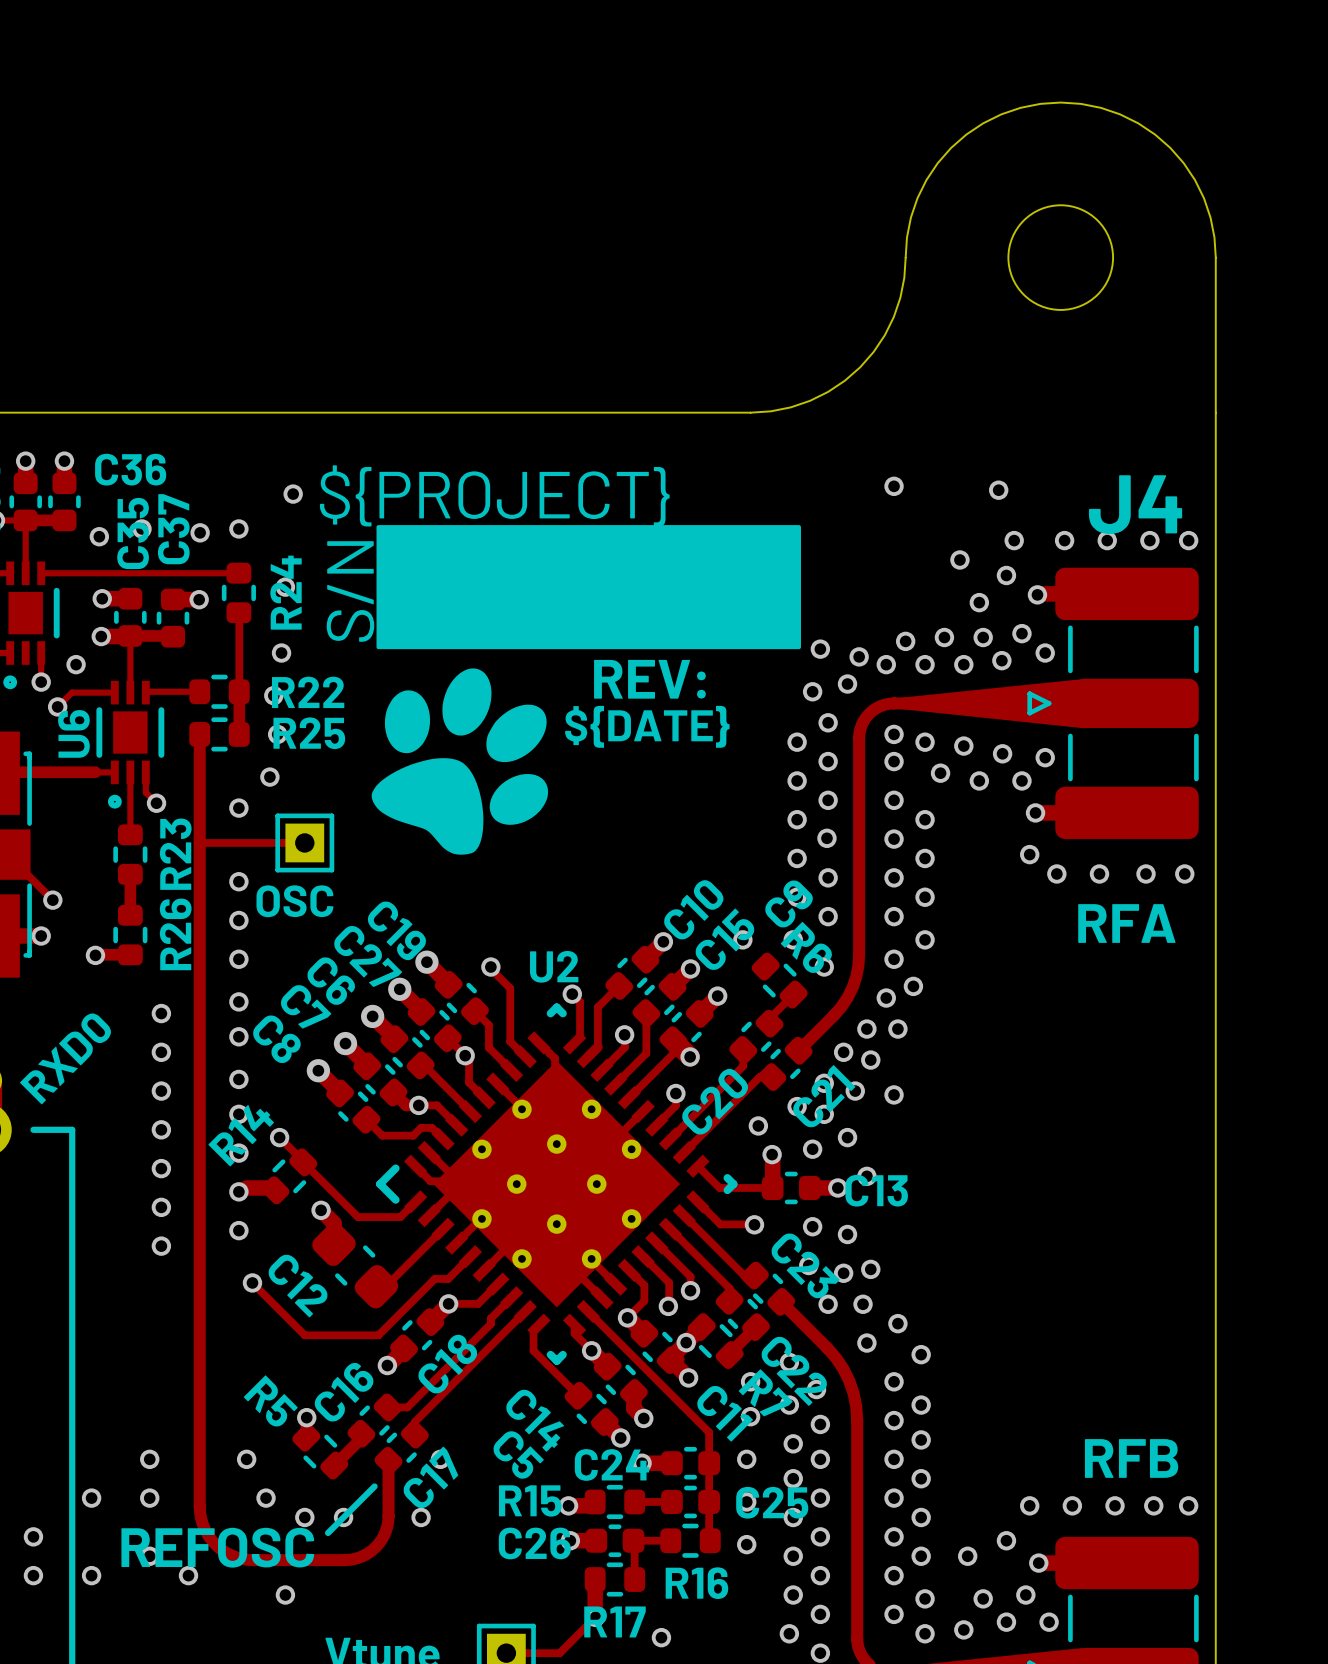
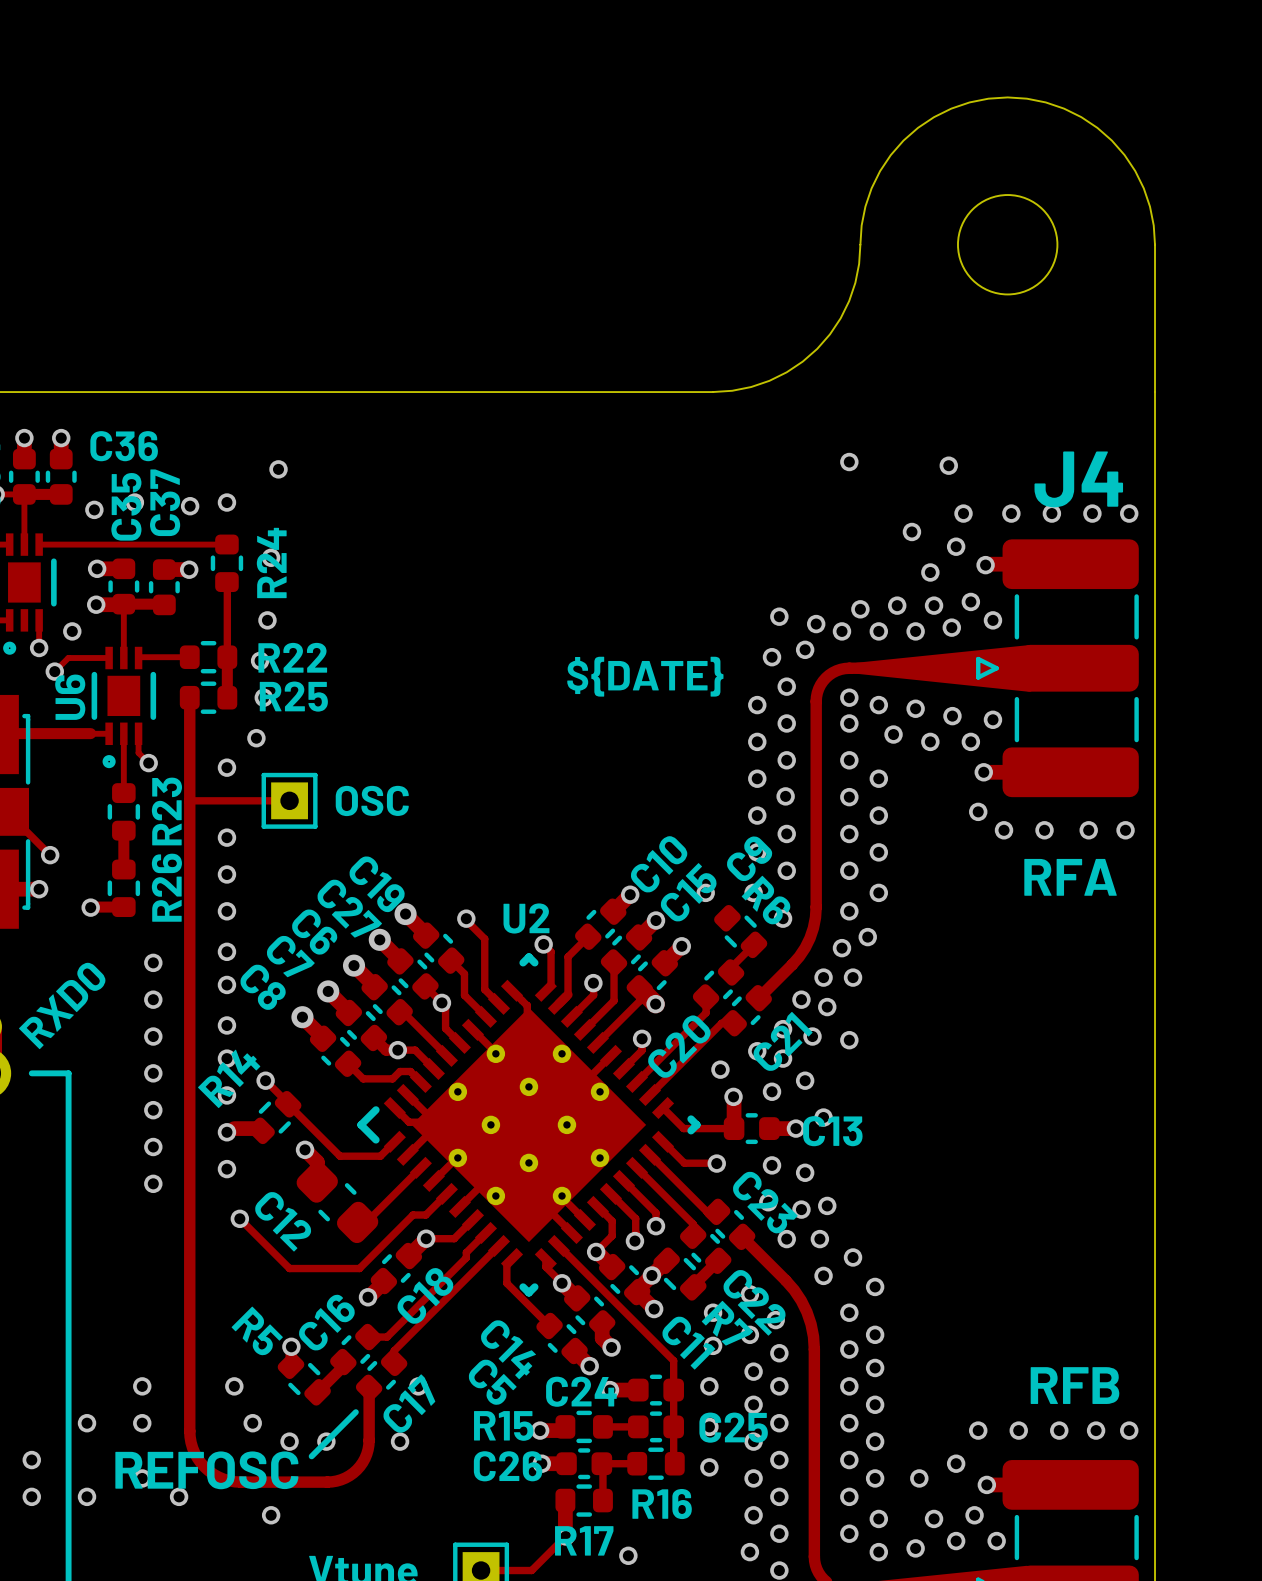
text: ${PROJECT} (494, 495) -> none
drawing: [371, 525, 802, 855] -> none
text: S/N (350, 591) -> none
text: REV: (649, 679) -> none
text position: ${DATE} (647, 726) -> ${DATE} (645, 676)
text position: OSC (294, 901) -> OSC (372, 800)

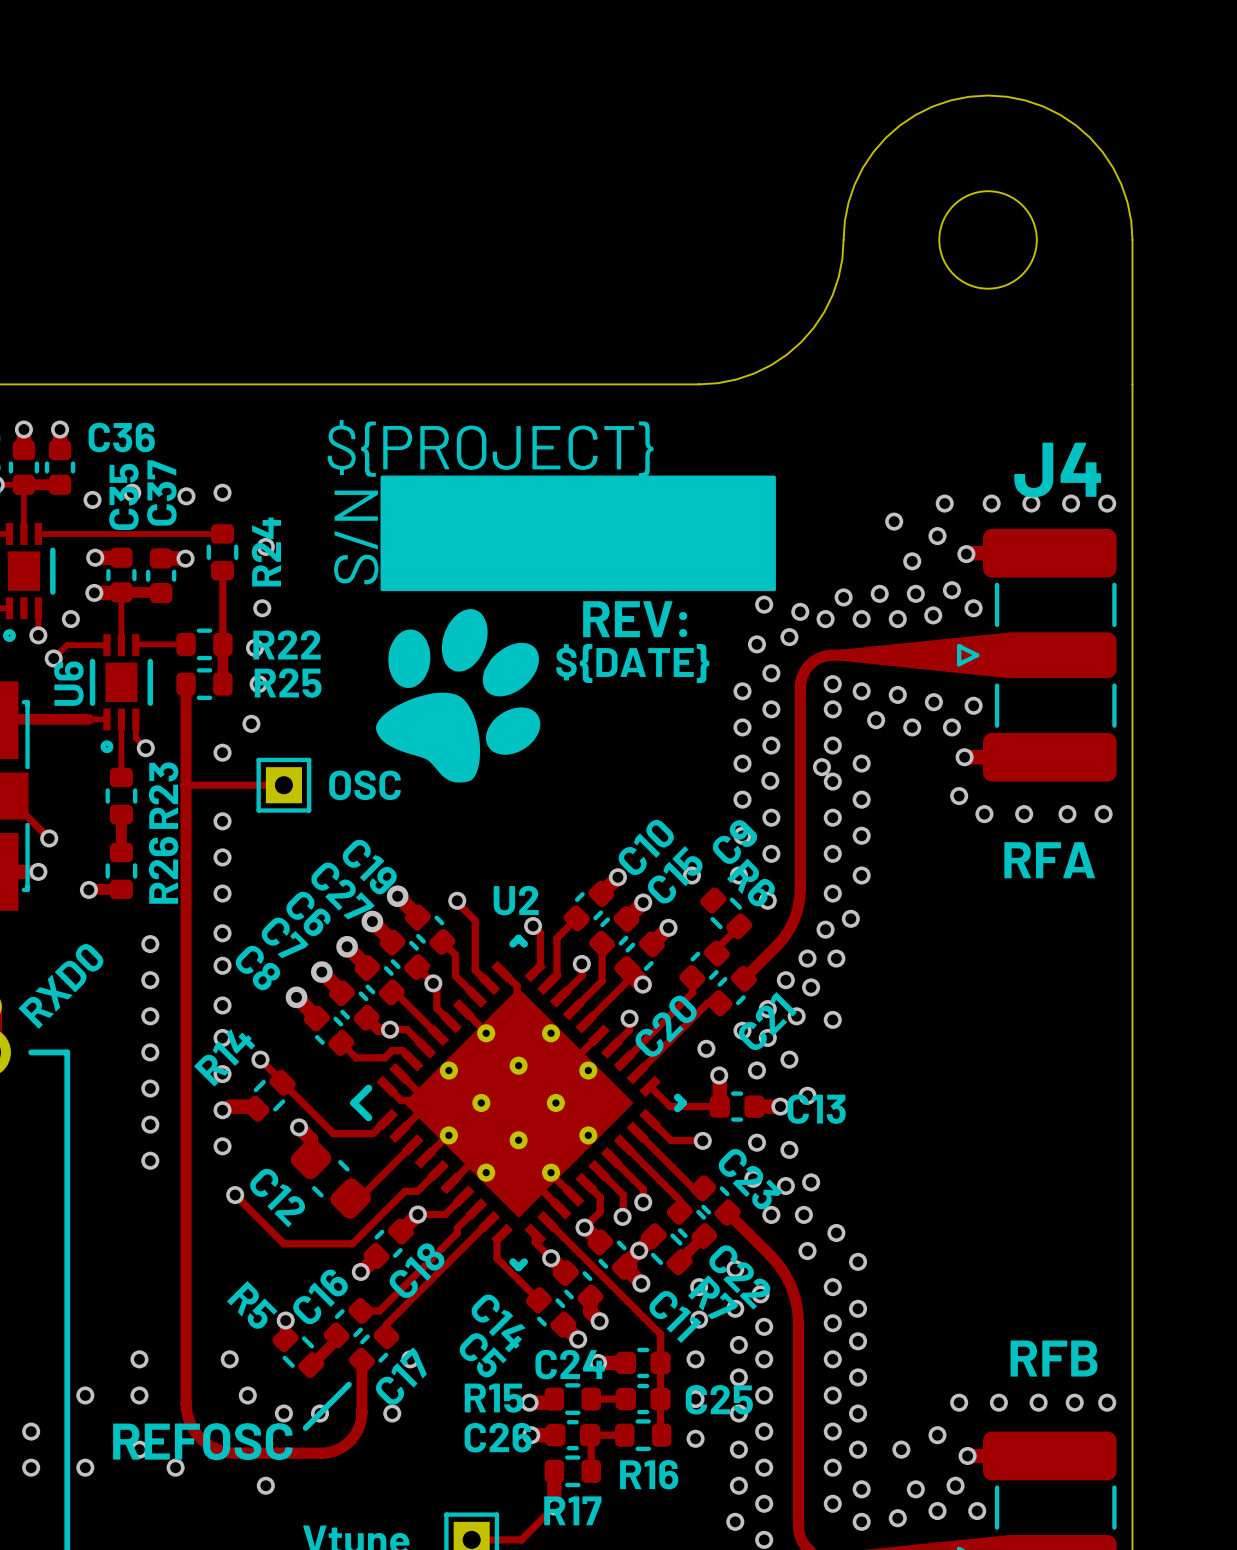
text: none -> ${PROJECT} (490, 448)
via: (849, 462) -> none
via: (948, 465) -> none
via: (278, 469) -> none
drawing: none -> [376, 475, 776, 783]
text: none -> S/N (356, 537)
text: none -> REV: (635, 619)
via: none -> (821, 767)
via: (628, 1555) -> none

